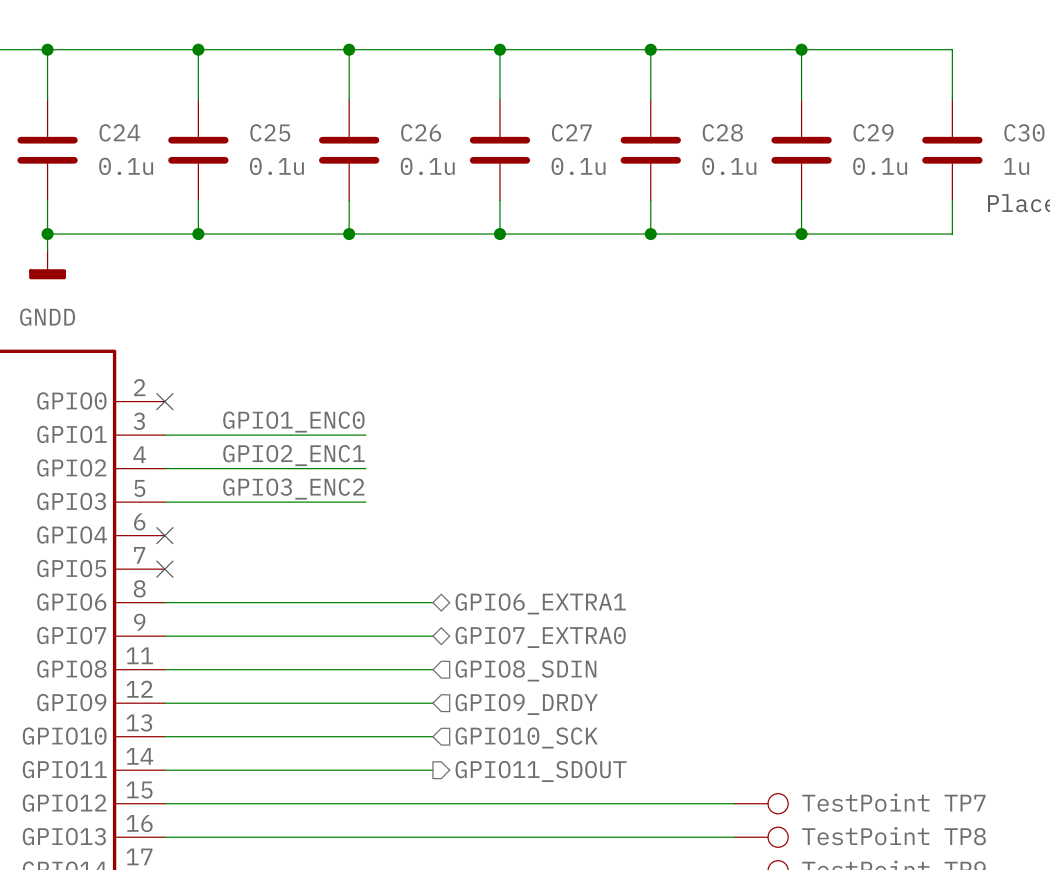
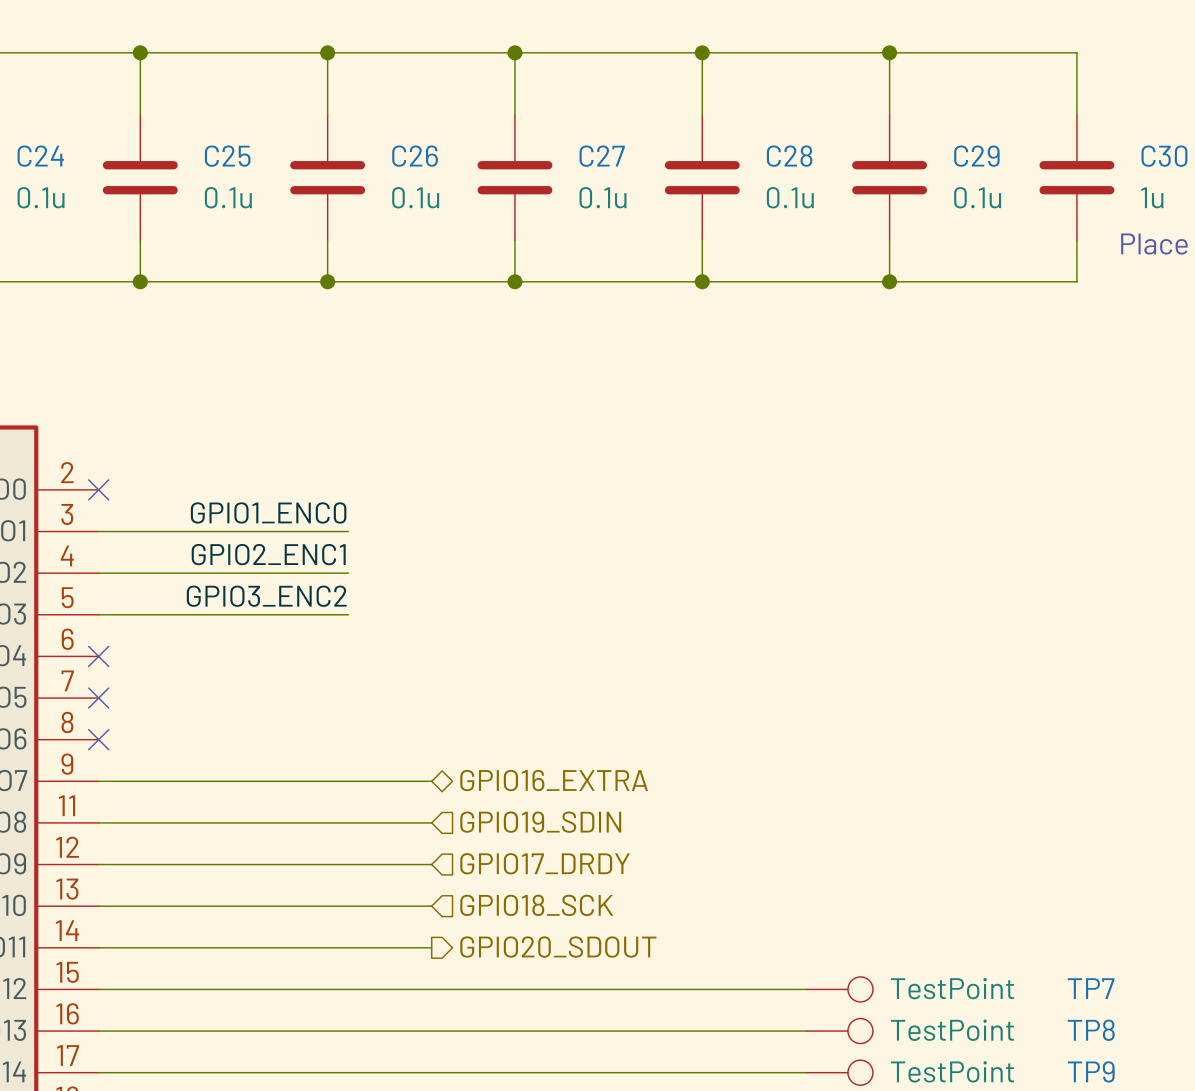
wire: (164, 602) (432, 602) -> none
no-connect mark: none -> (98, 739)
hierarchical label: GPIO6_EXTRA1 (540, 603) -> none
hierarchical label: GPIO7_EXTRA0 (540, 637) -> GPIO16_EXTRA (554, 780)
hierarchical label: GPIO8_SDIN (525, 670) -> GPIO19_SDIN (540, 822)
hierarchical label: GPIO9_DRDY (526, 704) -> GPIO17_DRDY (545, 863)
hierarchical label: GPIO10_SCK (526, 737) -> GPIO18_SCK (536, 905)
hierarchical label: GPIO11_SDOUT (541, 771) -> GPIO20_SDOUT (558, 947)

